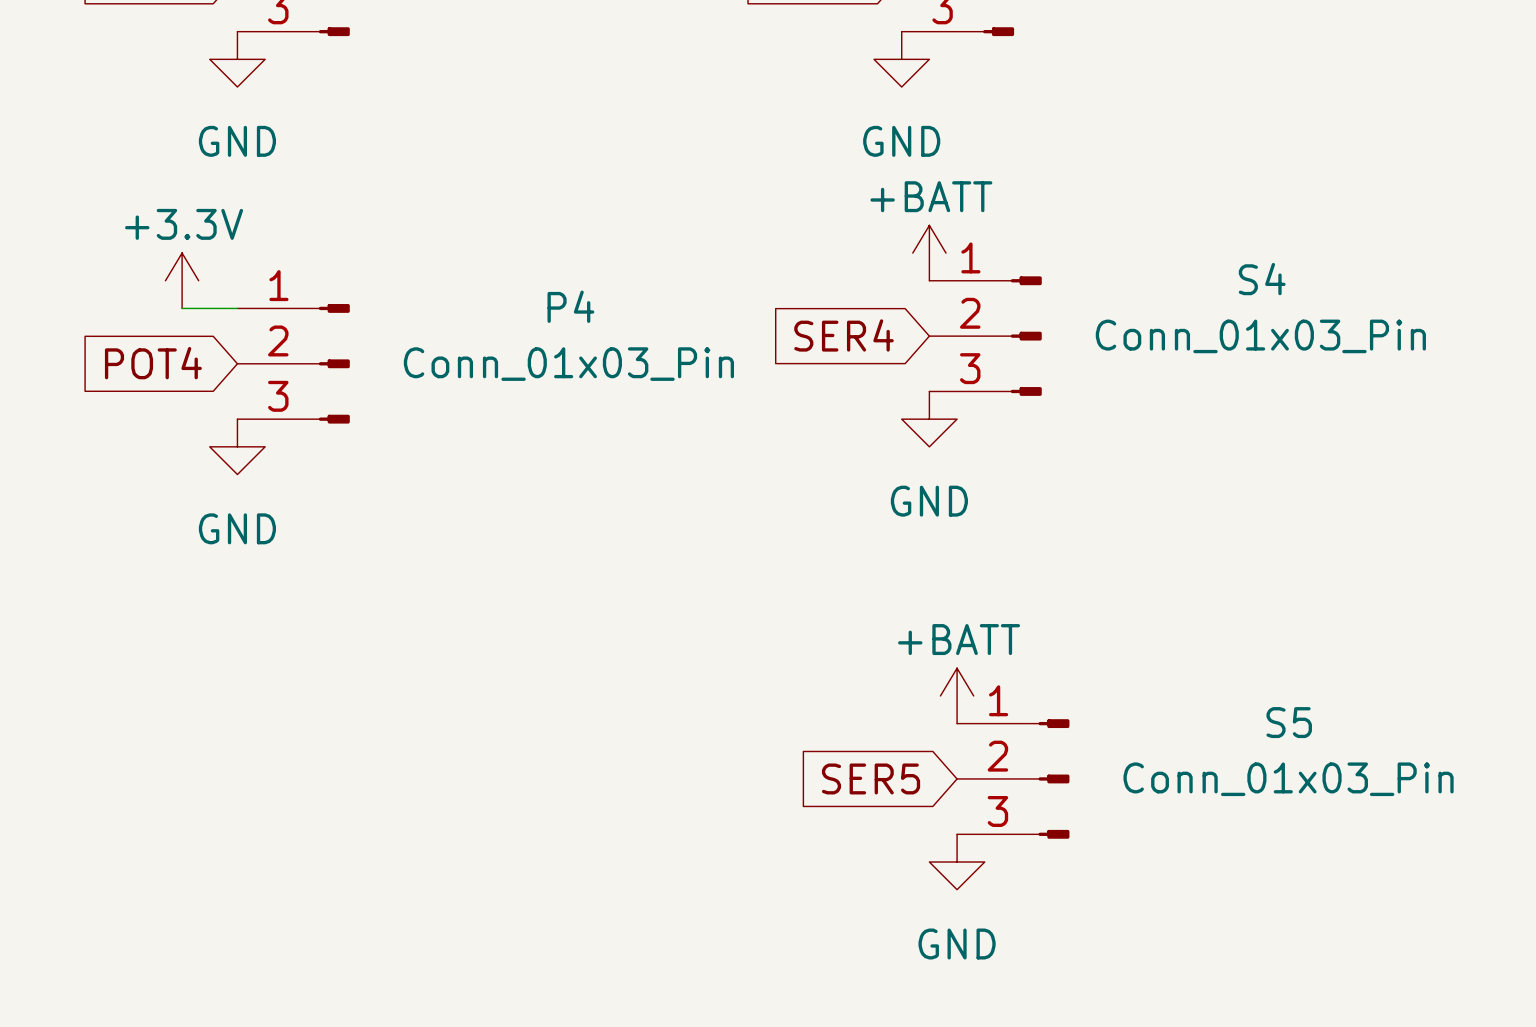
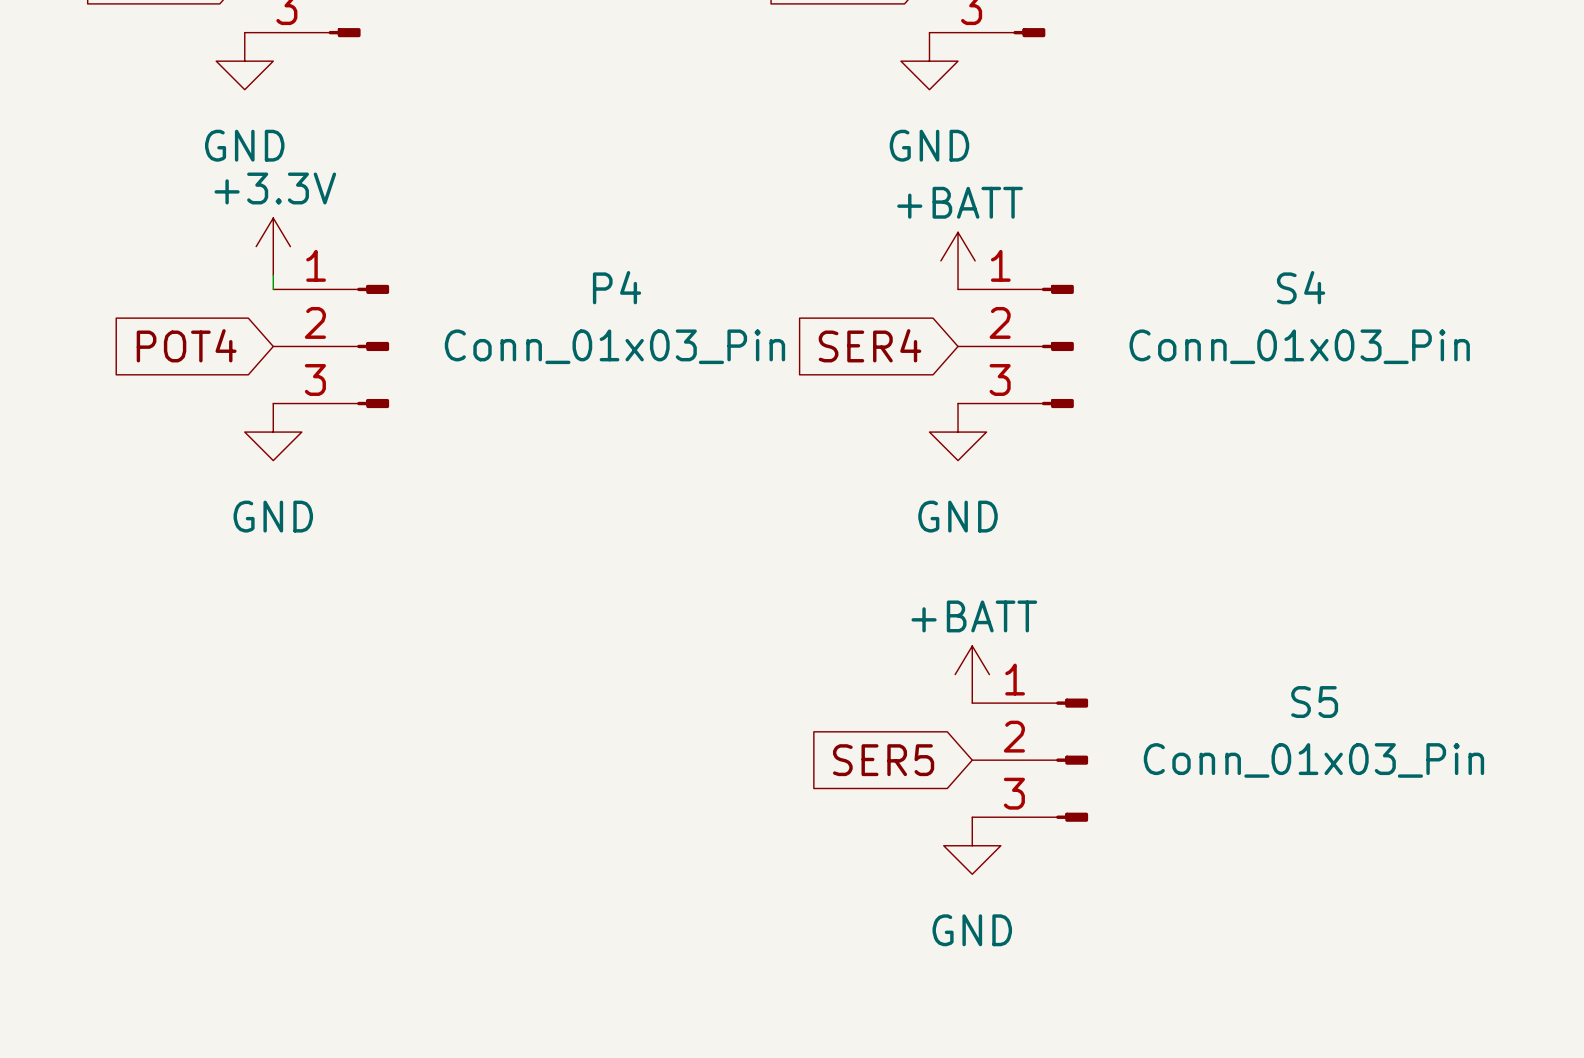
wire: none -> (273, 275) (273, 289)
power symbol position: +3.3V (182, 280) -> +3.3V (273, 246)
global label position: POT4 (153, 363) -> POT4 (186, 345)
P4 position: (293, 363) -> (331, 346)
power symbol position: GND (237, 446) -> GND (273, 432)
power symbol position: +BATT (957, 695) -> +BATT (972, 674)
global label position: SER5 (871, 778) -> SER5 (883, 760)
S5 position: (1013, 778) -> (1030, 760)
power symbol position: GND (957, 862) -> GND (972, 845)

